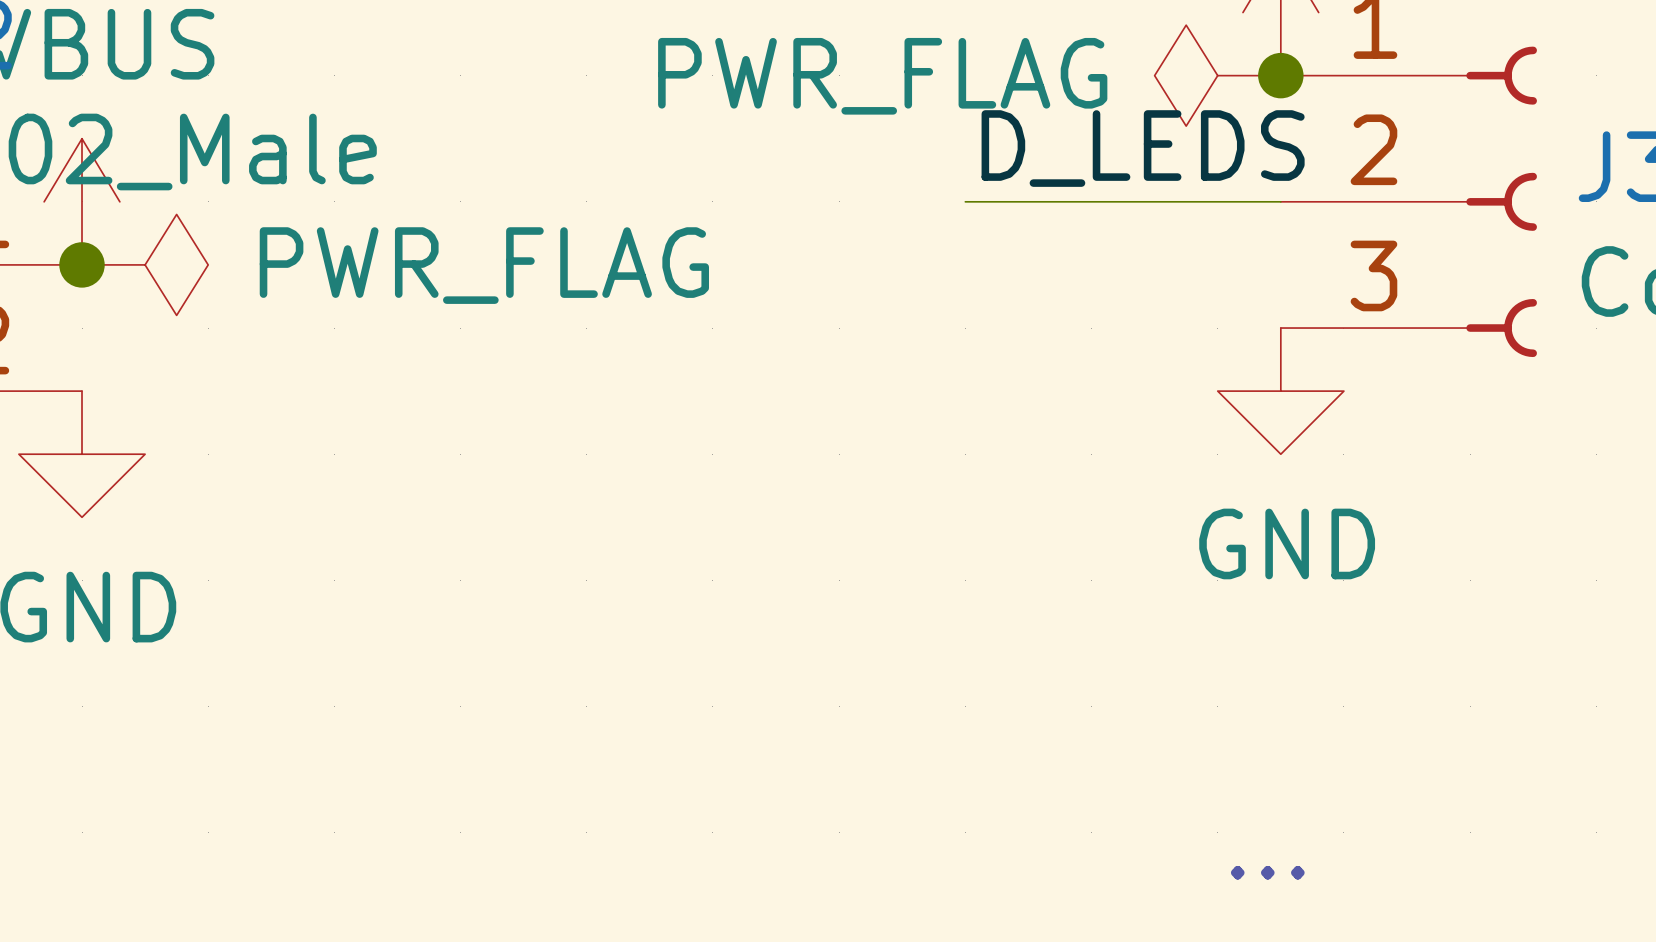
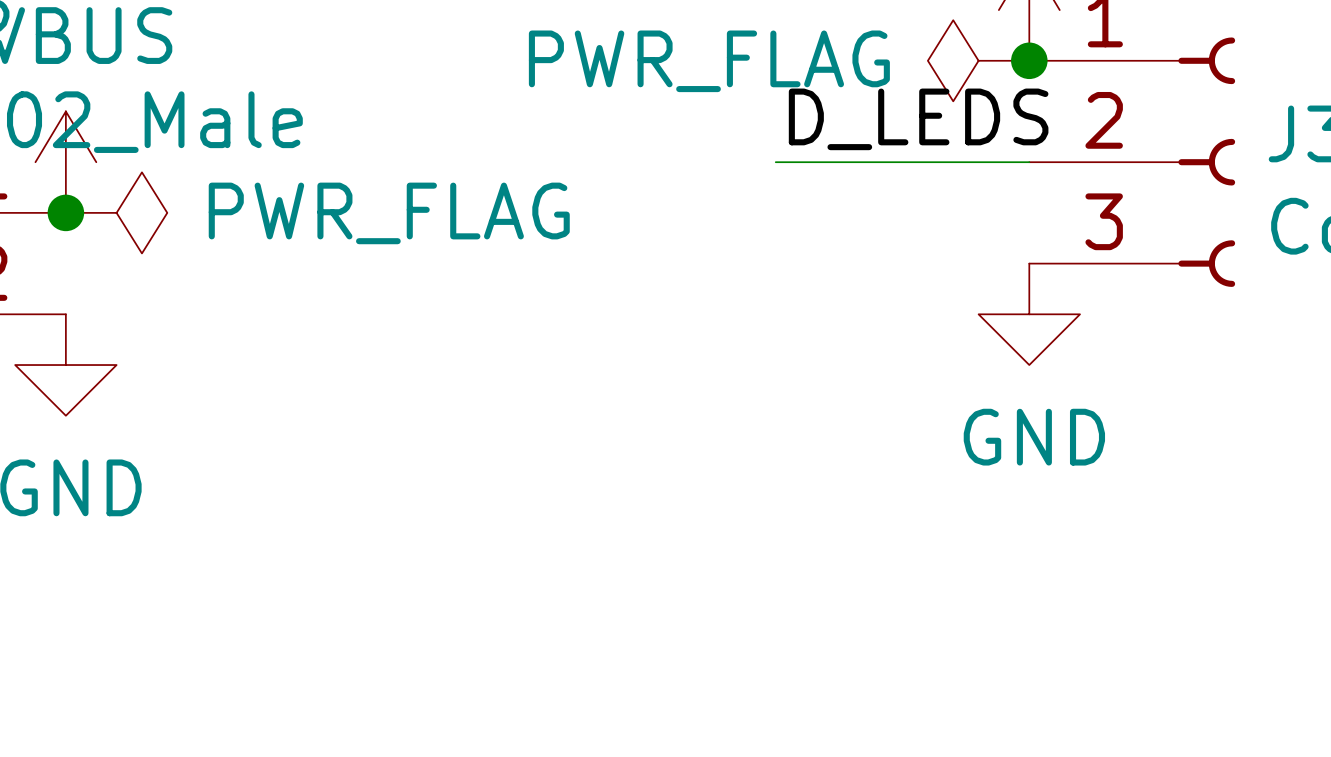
text: ... (1267, 872) -> none

